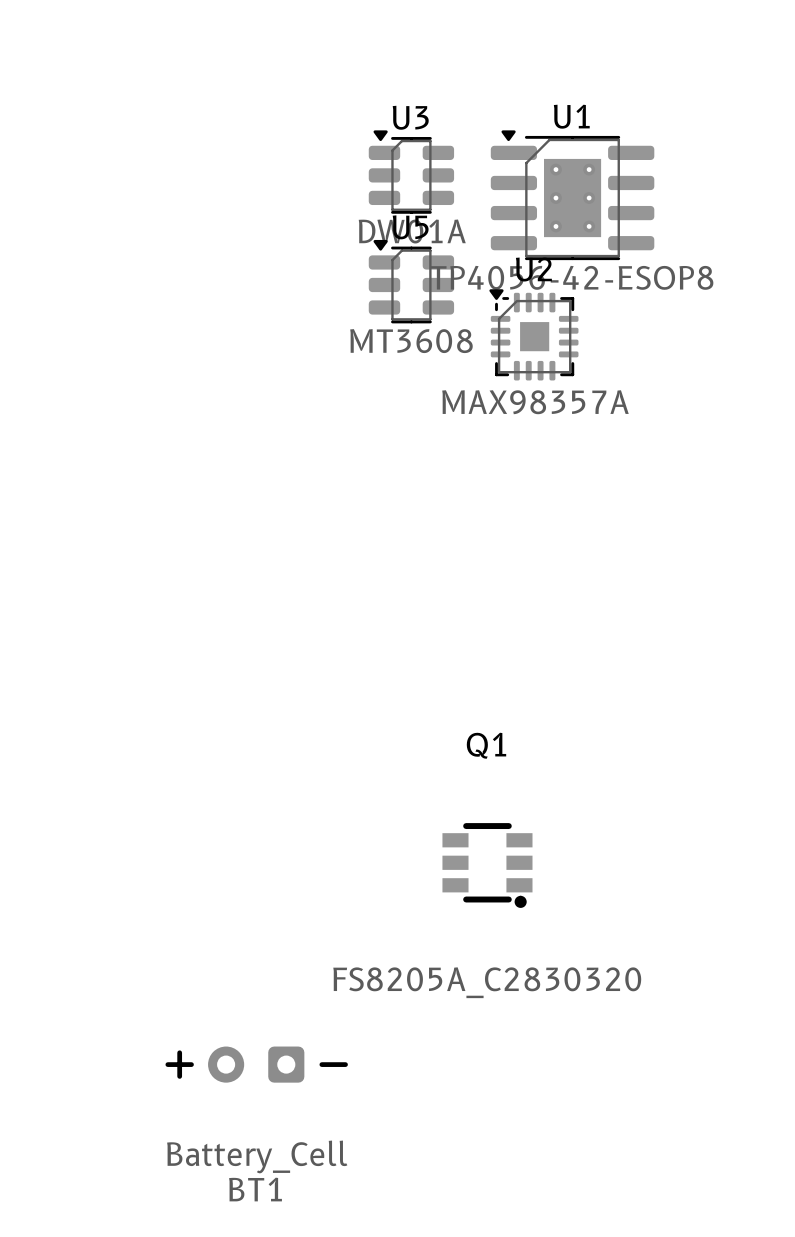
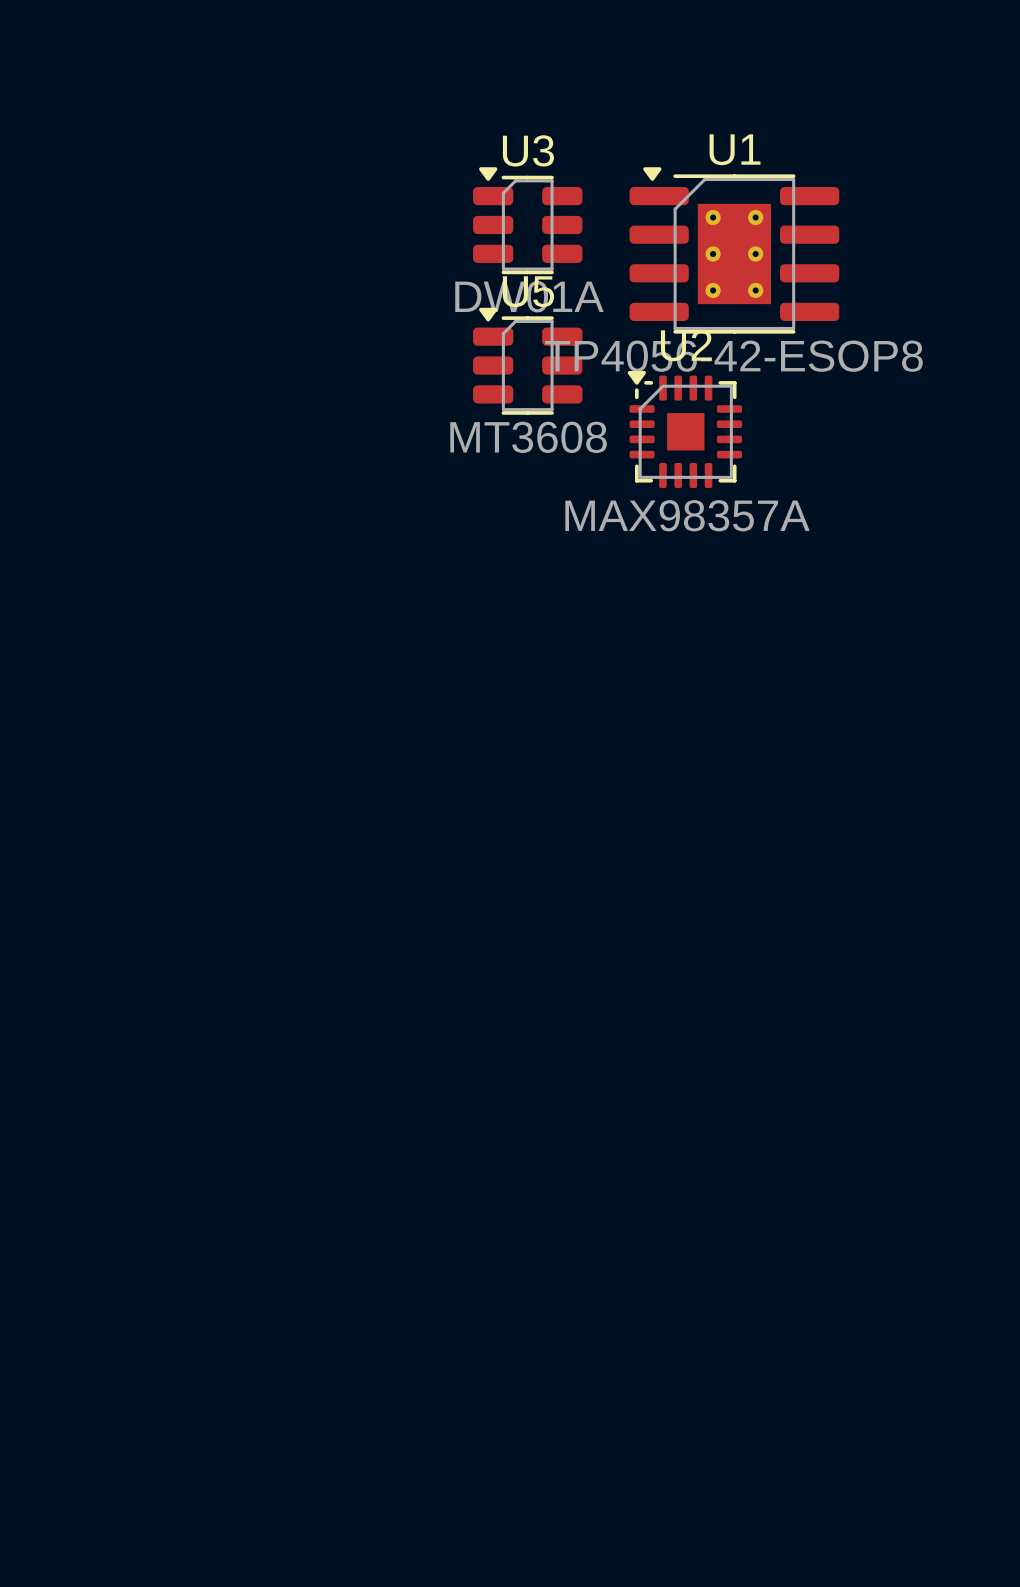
Q1: FS8205A_C2830320 (487, 865) -> none
BT1: Battery_Cell (256, 1064) -> none

